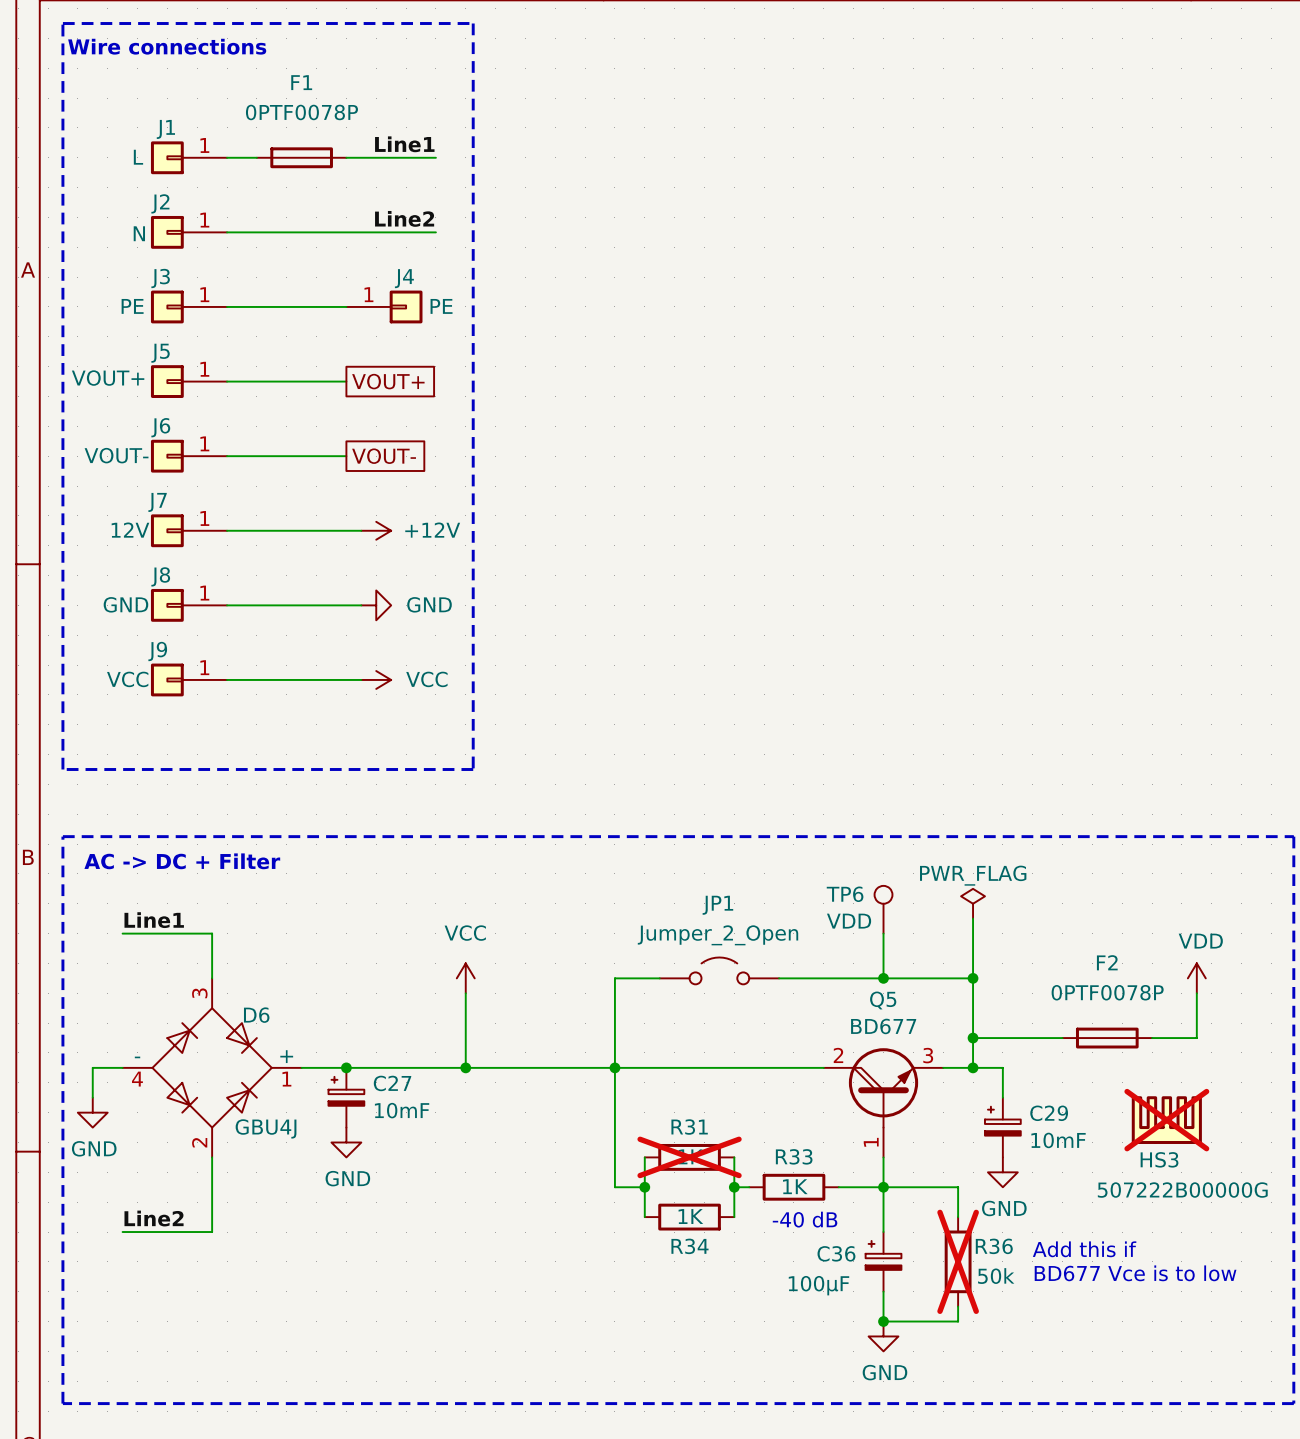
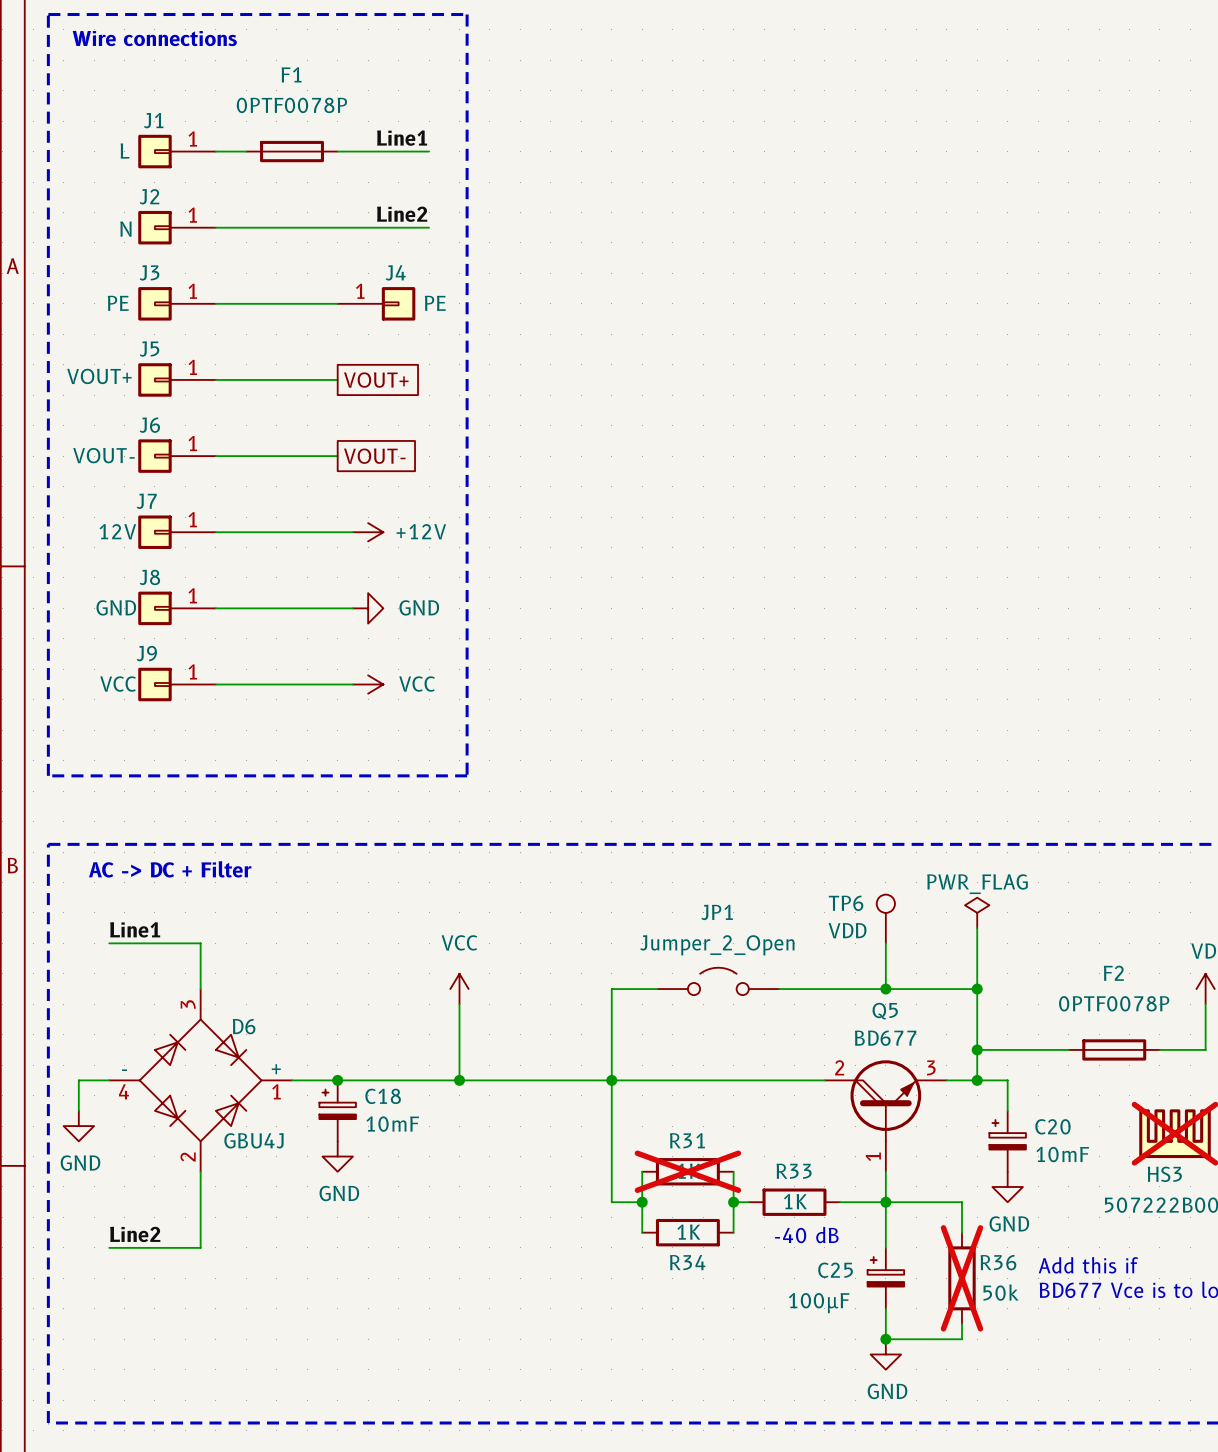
C27 name: C27 (392, 1083) -> C18 (383, 1096)
C29 name: C29 (1049, 1113) -> C20 (1052, 1126)
C36 name: C36 (836, 1253) -> C25 (835, 1270)

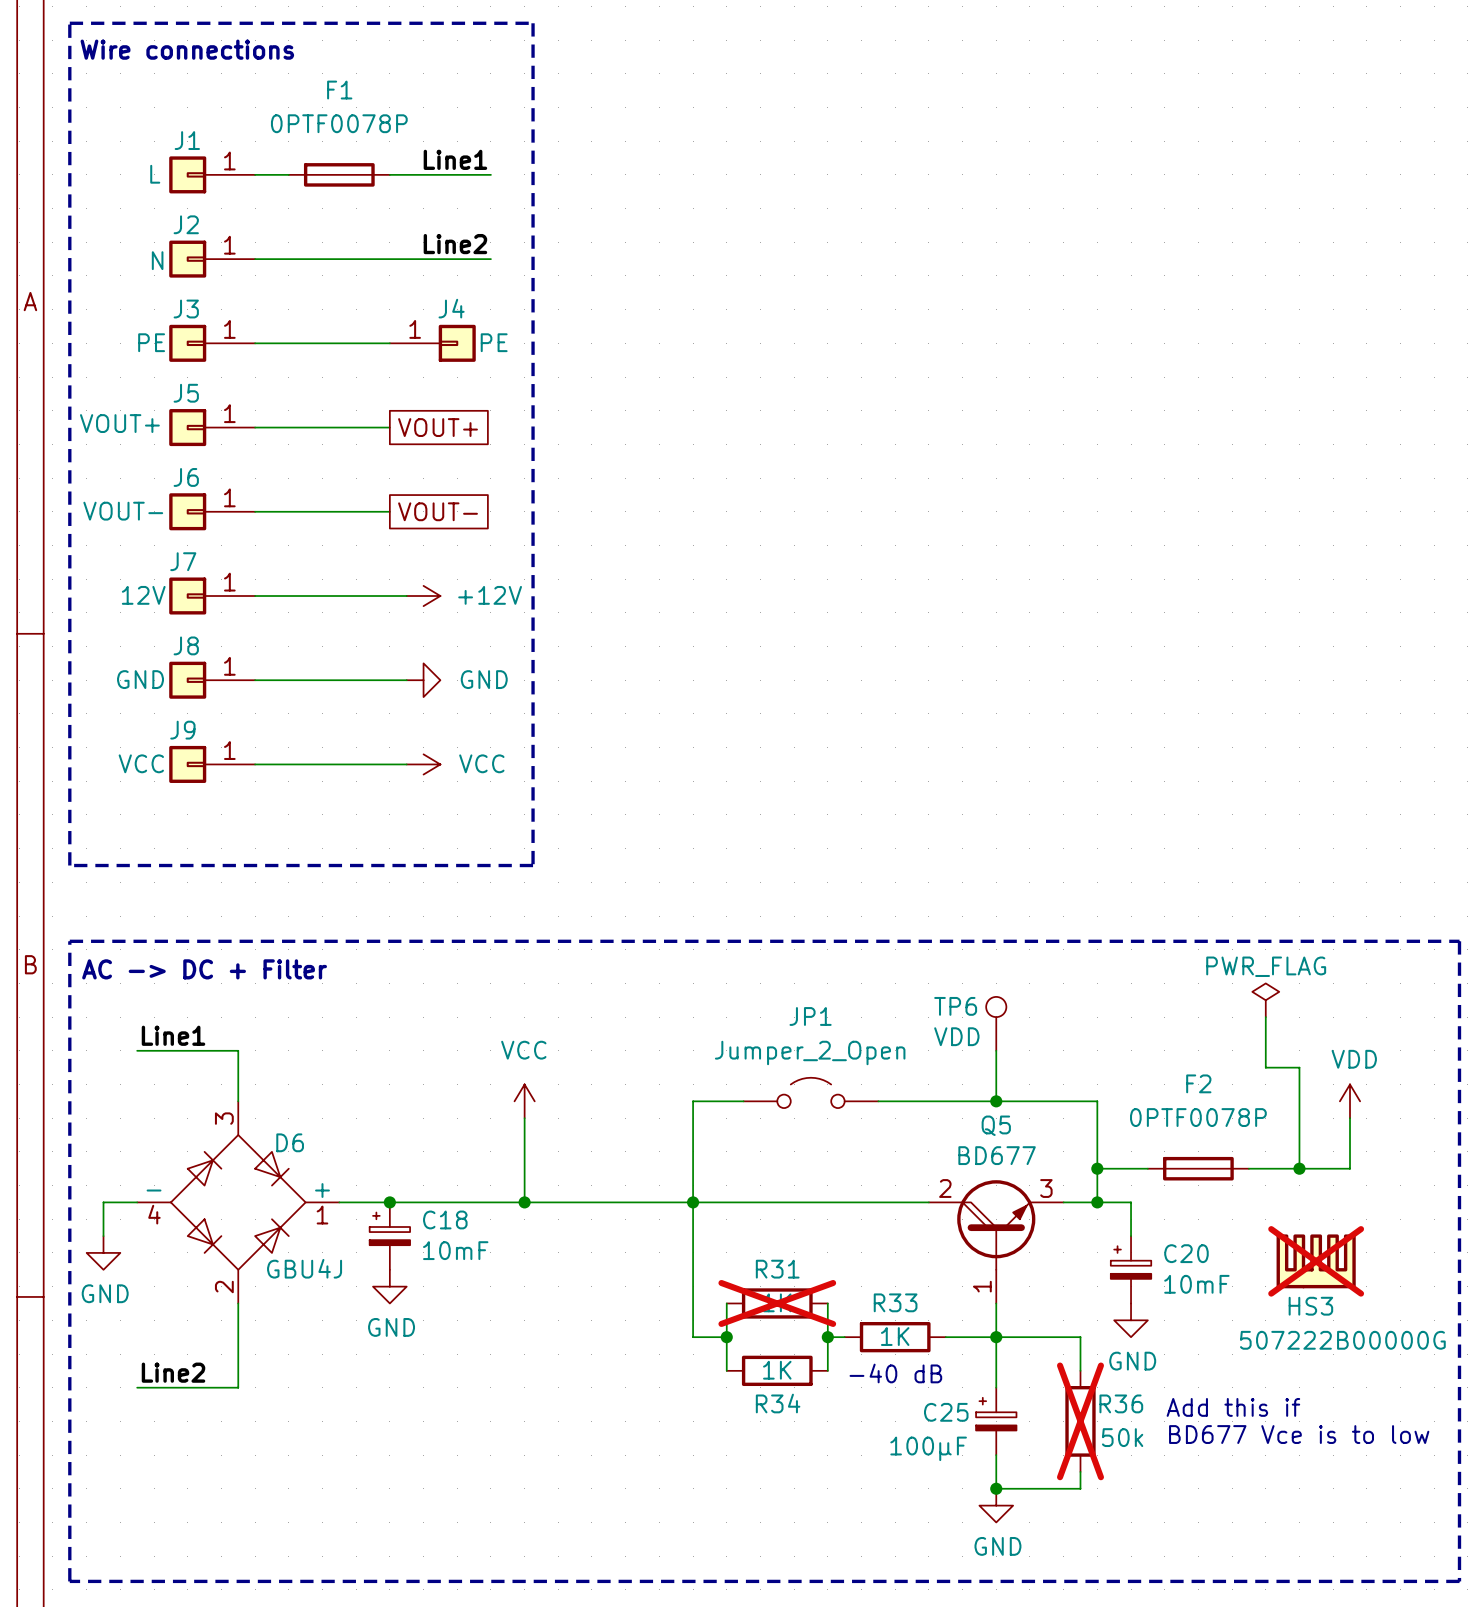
power symbol position: PWR_FLAG (977, 912) -> PWR_FLAG (1265, 1000)
wire: none -> (1265, 1017) (1265, 1067) (1299, 1067) (1299, 1168) (1248, 1168)
wire: (977, 928) (977, 989) -> none
junction: (977, 989) -> none
F2 position: (1114, 1049) -> (1198, 1168)
junction: none -> (1299, 1168)

